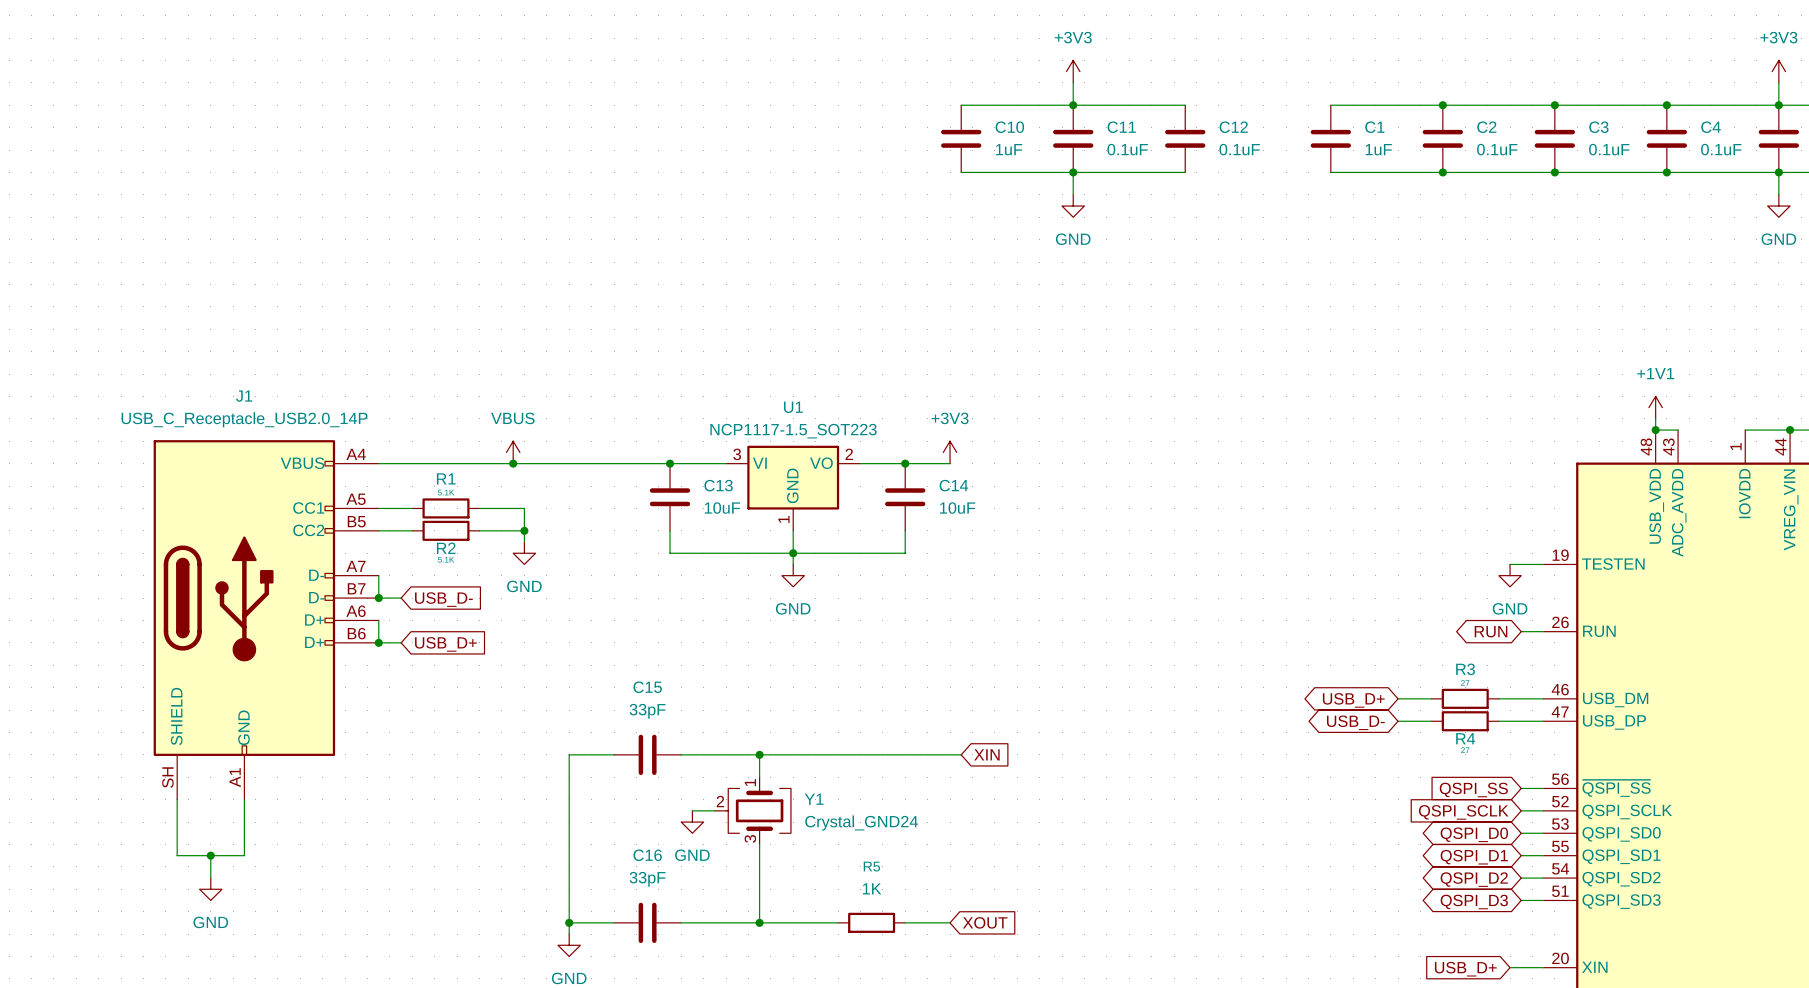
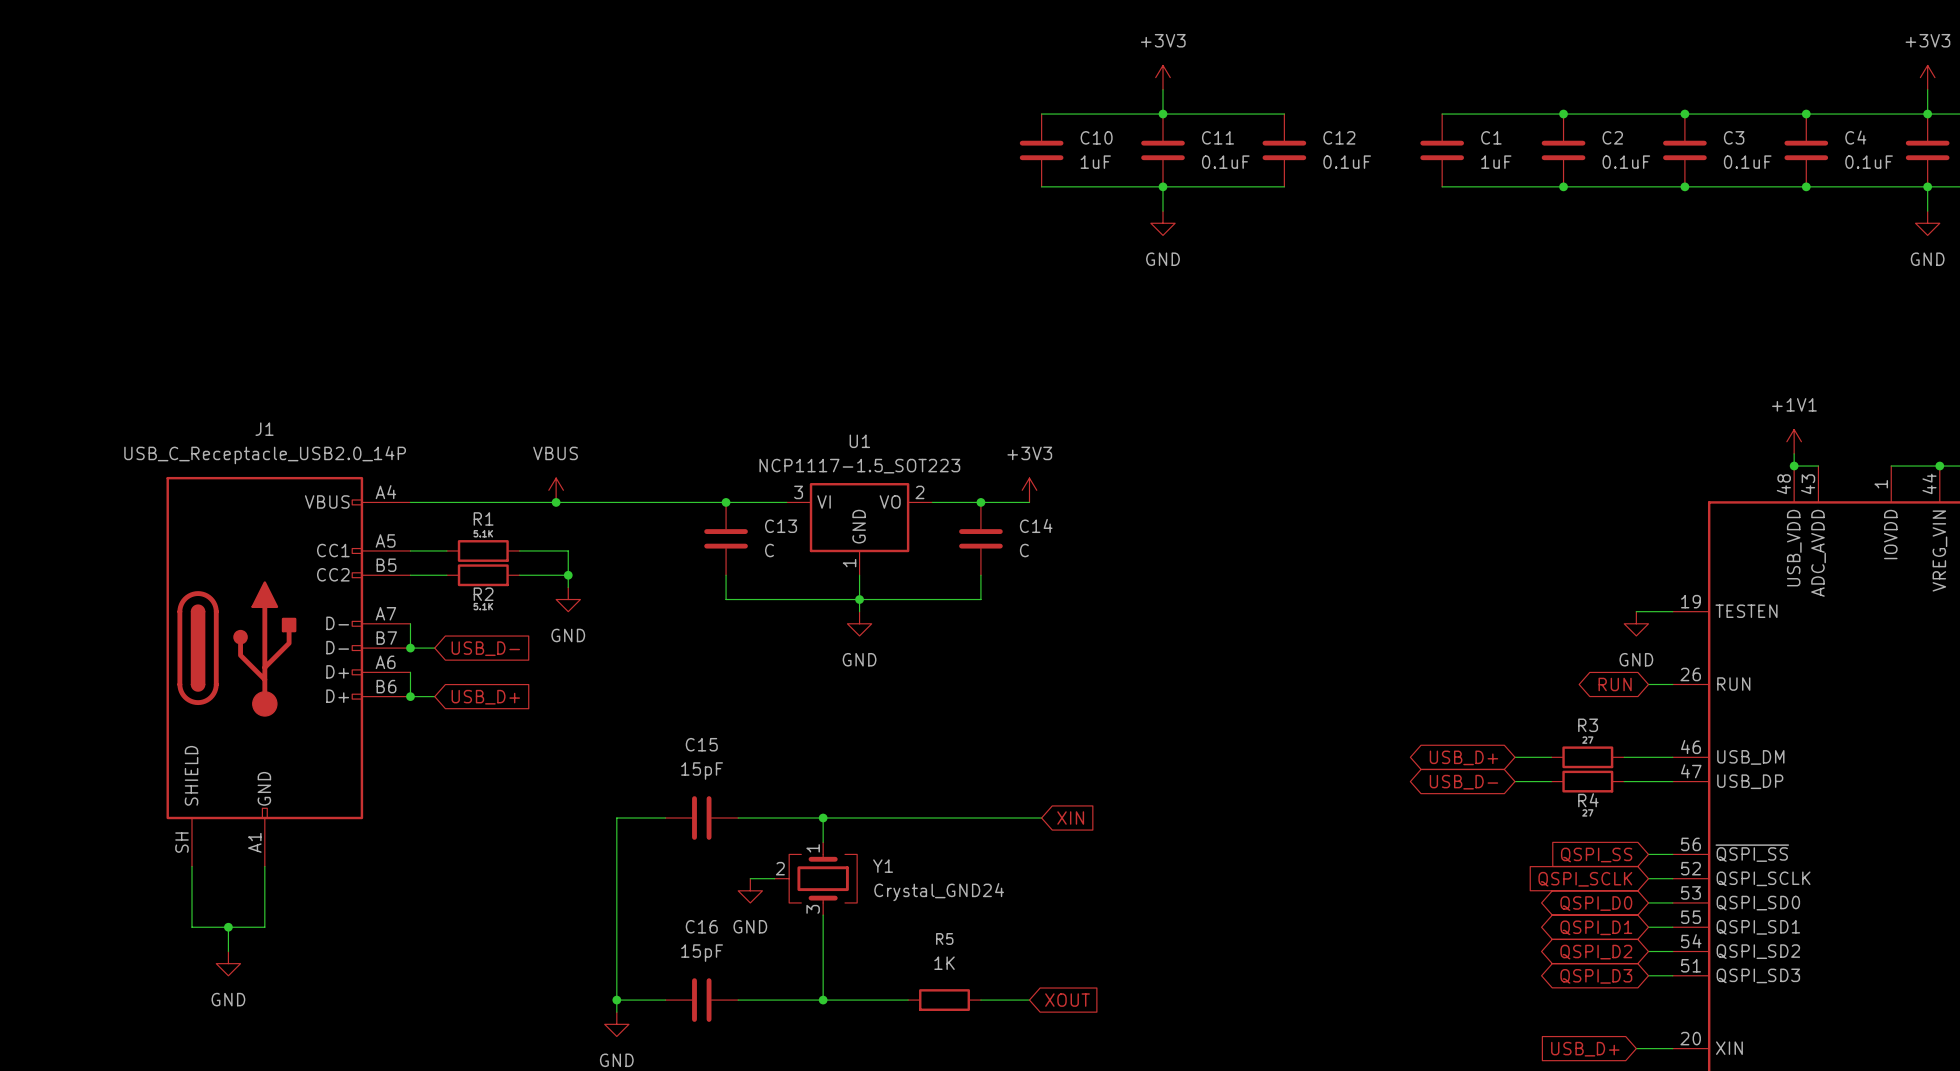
C13 value: 10uF (722, 508) -> C (769, 550)
C14 value: 10uF (957, 508) -> C (1024, 550)
C15 value: 33pF (647, 711) -> 15pF (702, 771)
C16 value: 33pF (647, 879) -> 15pF (702, 953)

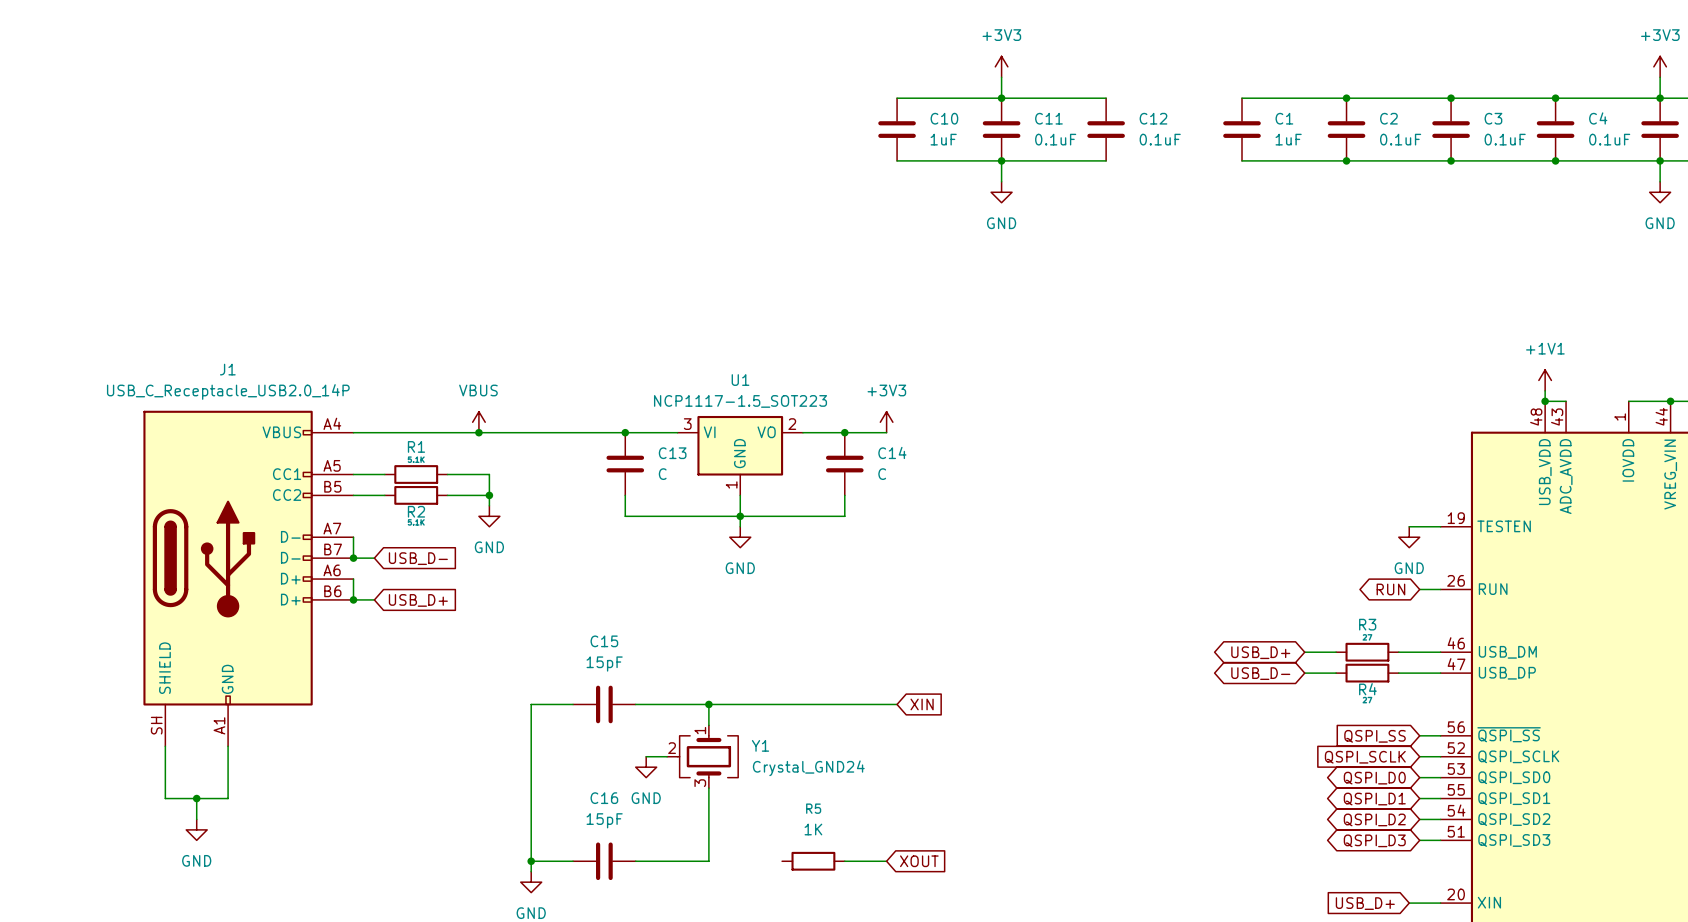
wire: (823, 1000) (908, 1000) -> none
junction: (823, 1000) -> none

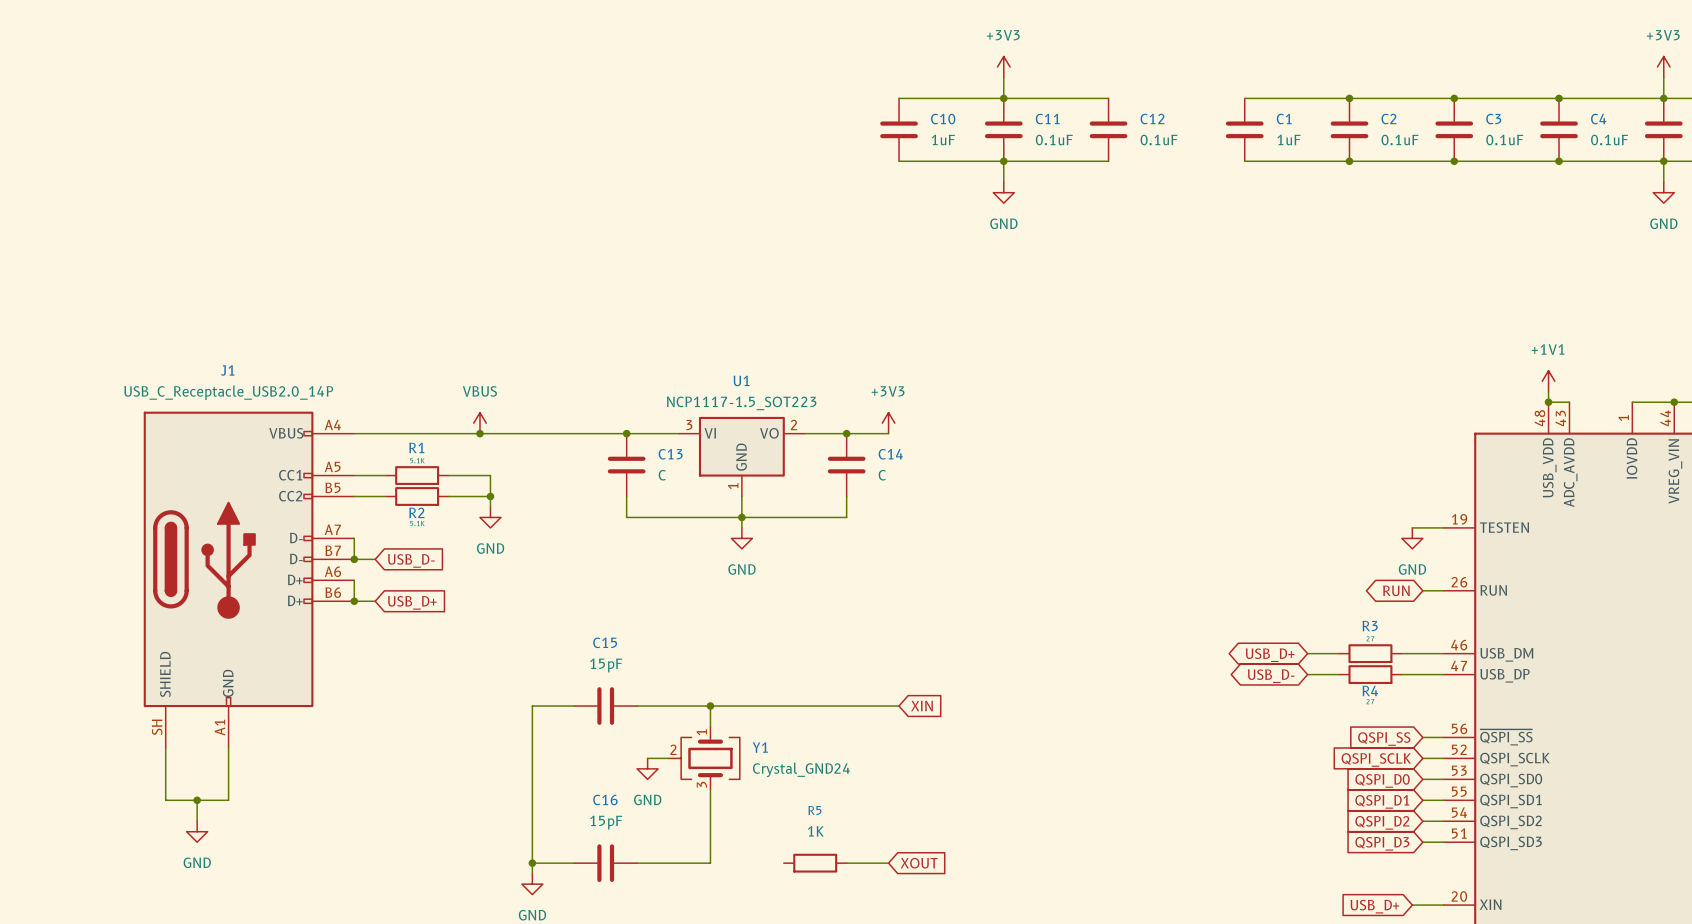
global label shape: bidirectional (1374, 778) -> input (1382, 780)
global label shape: bidirectional (1374, 799) -> input (1382, 801)
global label shape: bidirectional (1374, 819) -> input (1382, 822)
global label shape: bidirectional (1374, 840) -> input (1382, 843)

